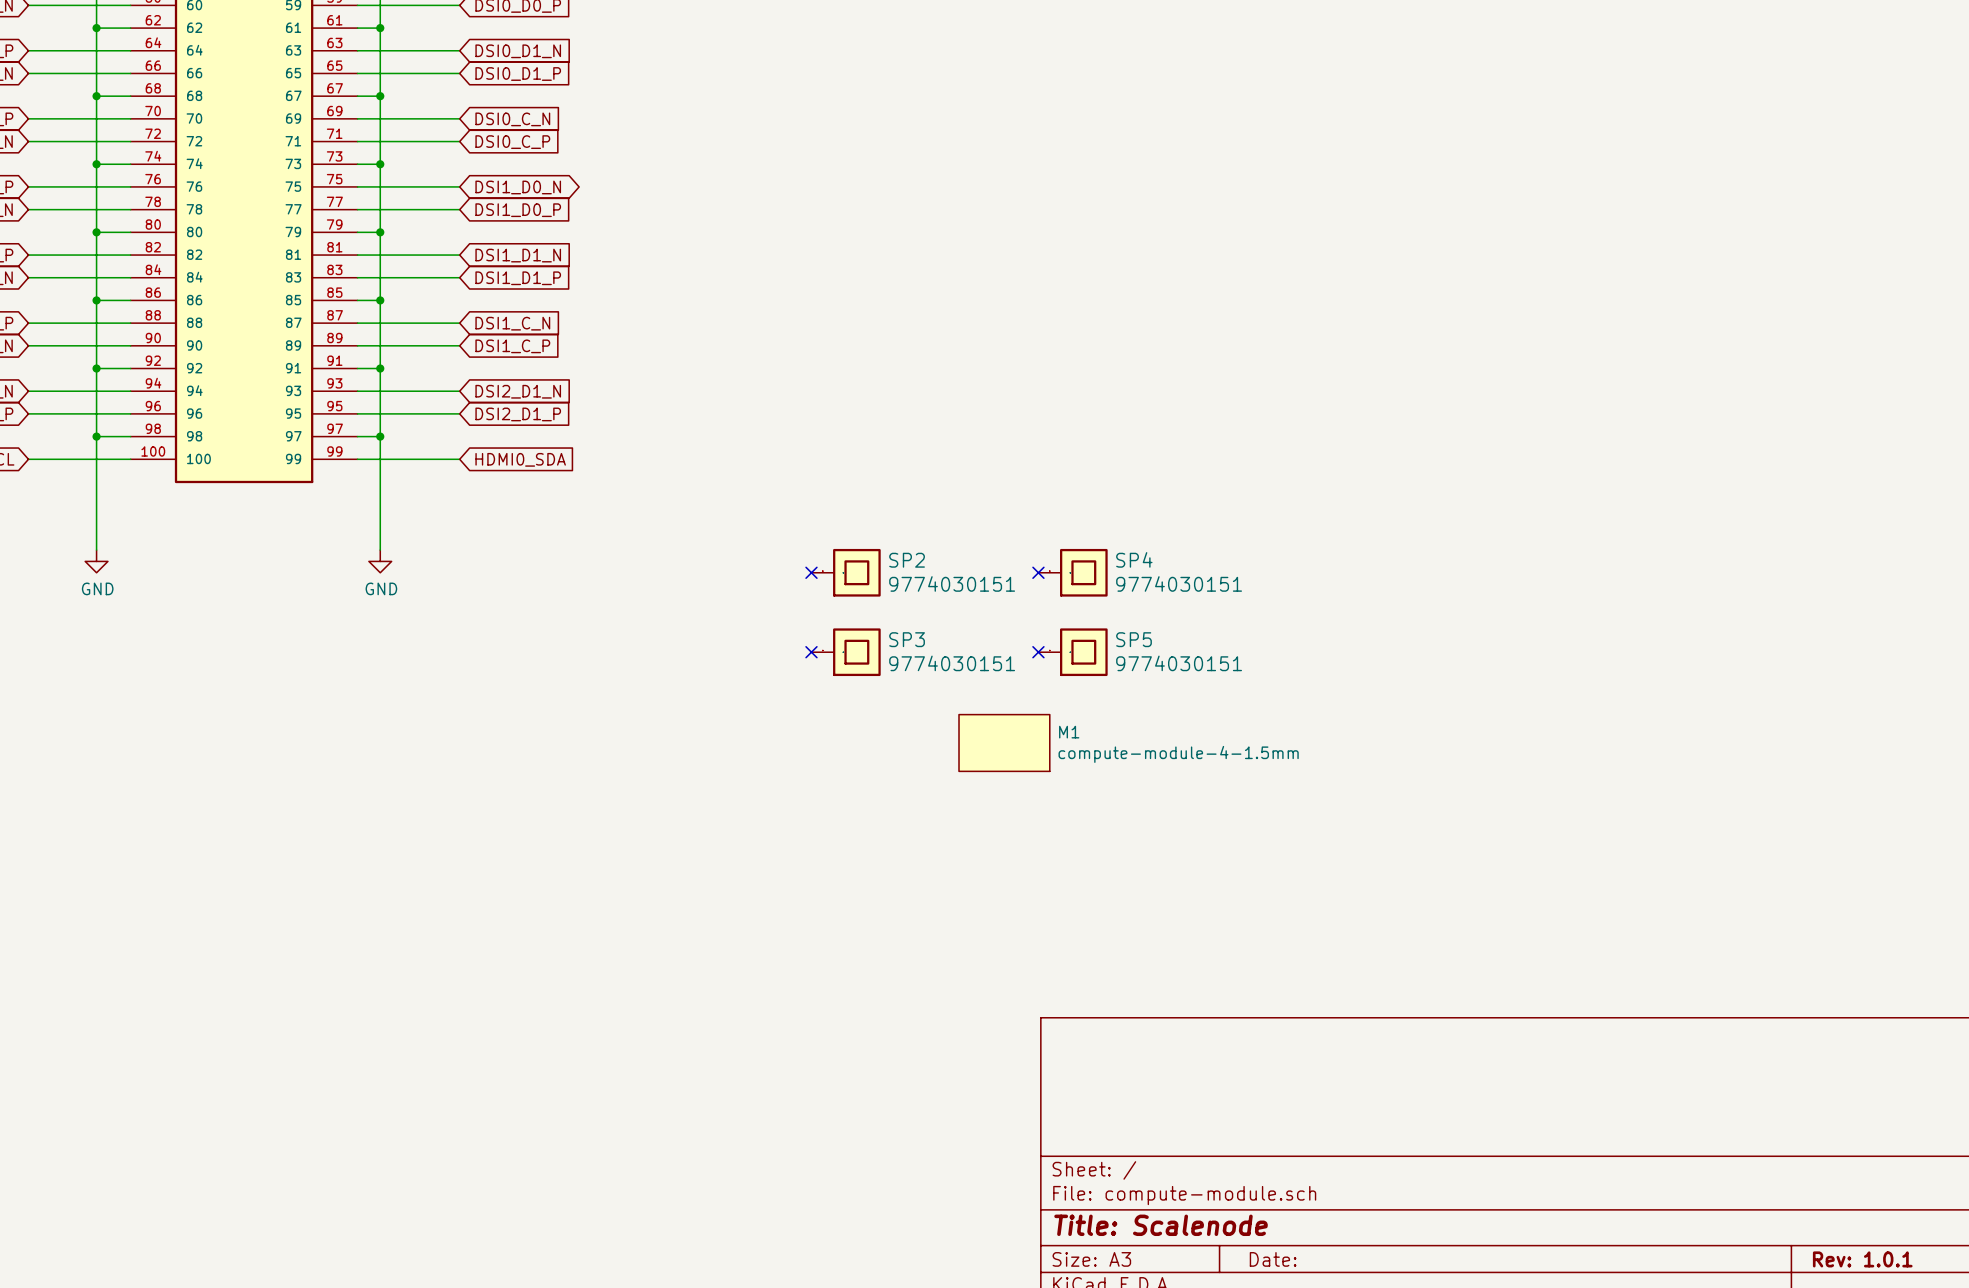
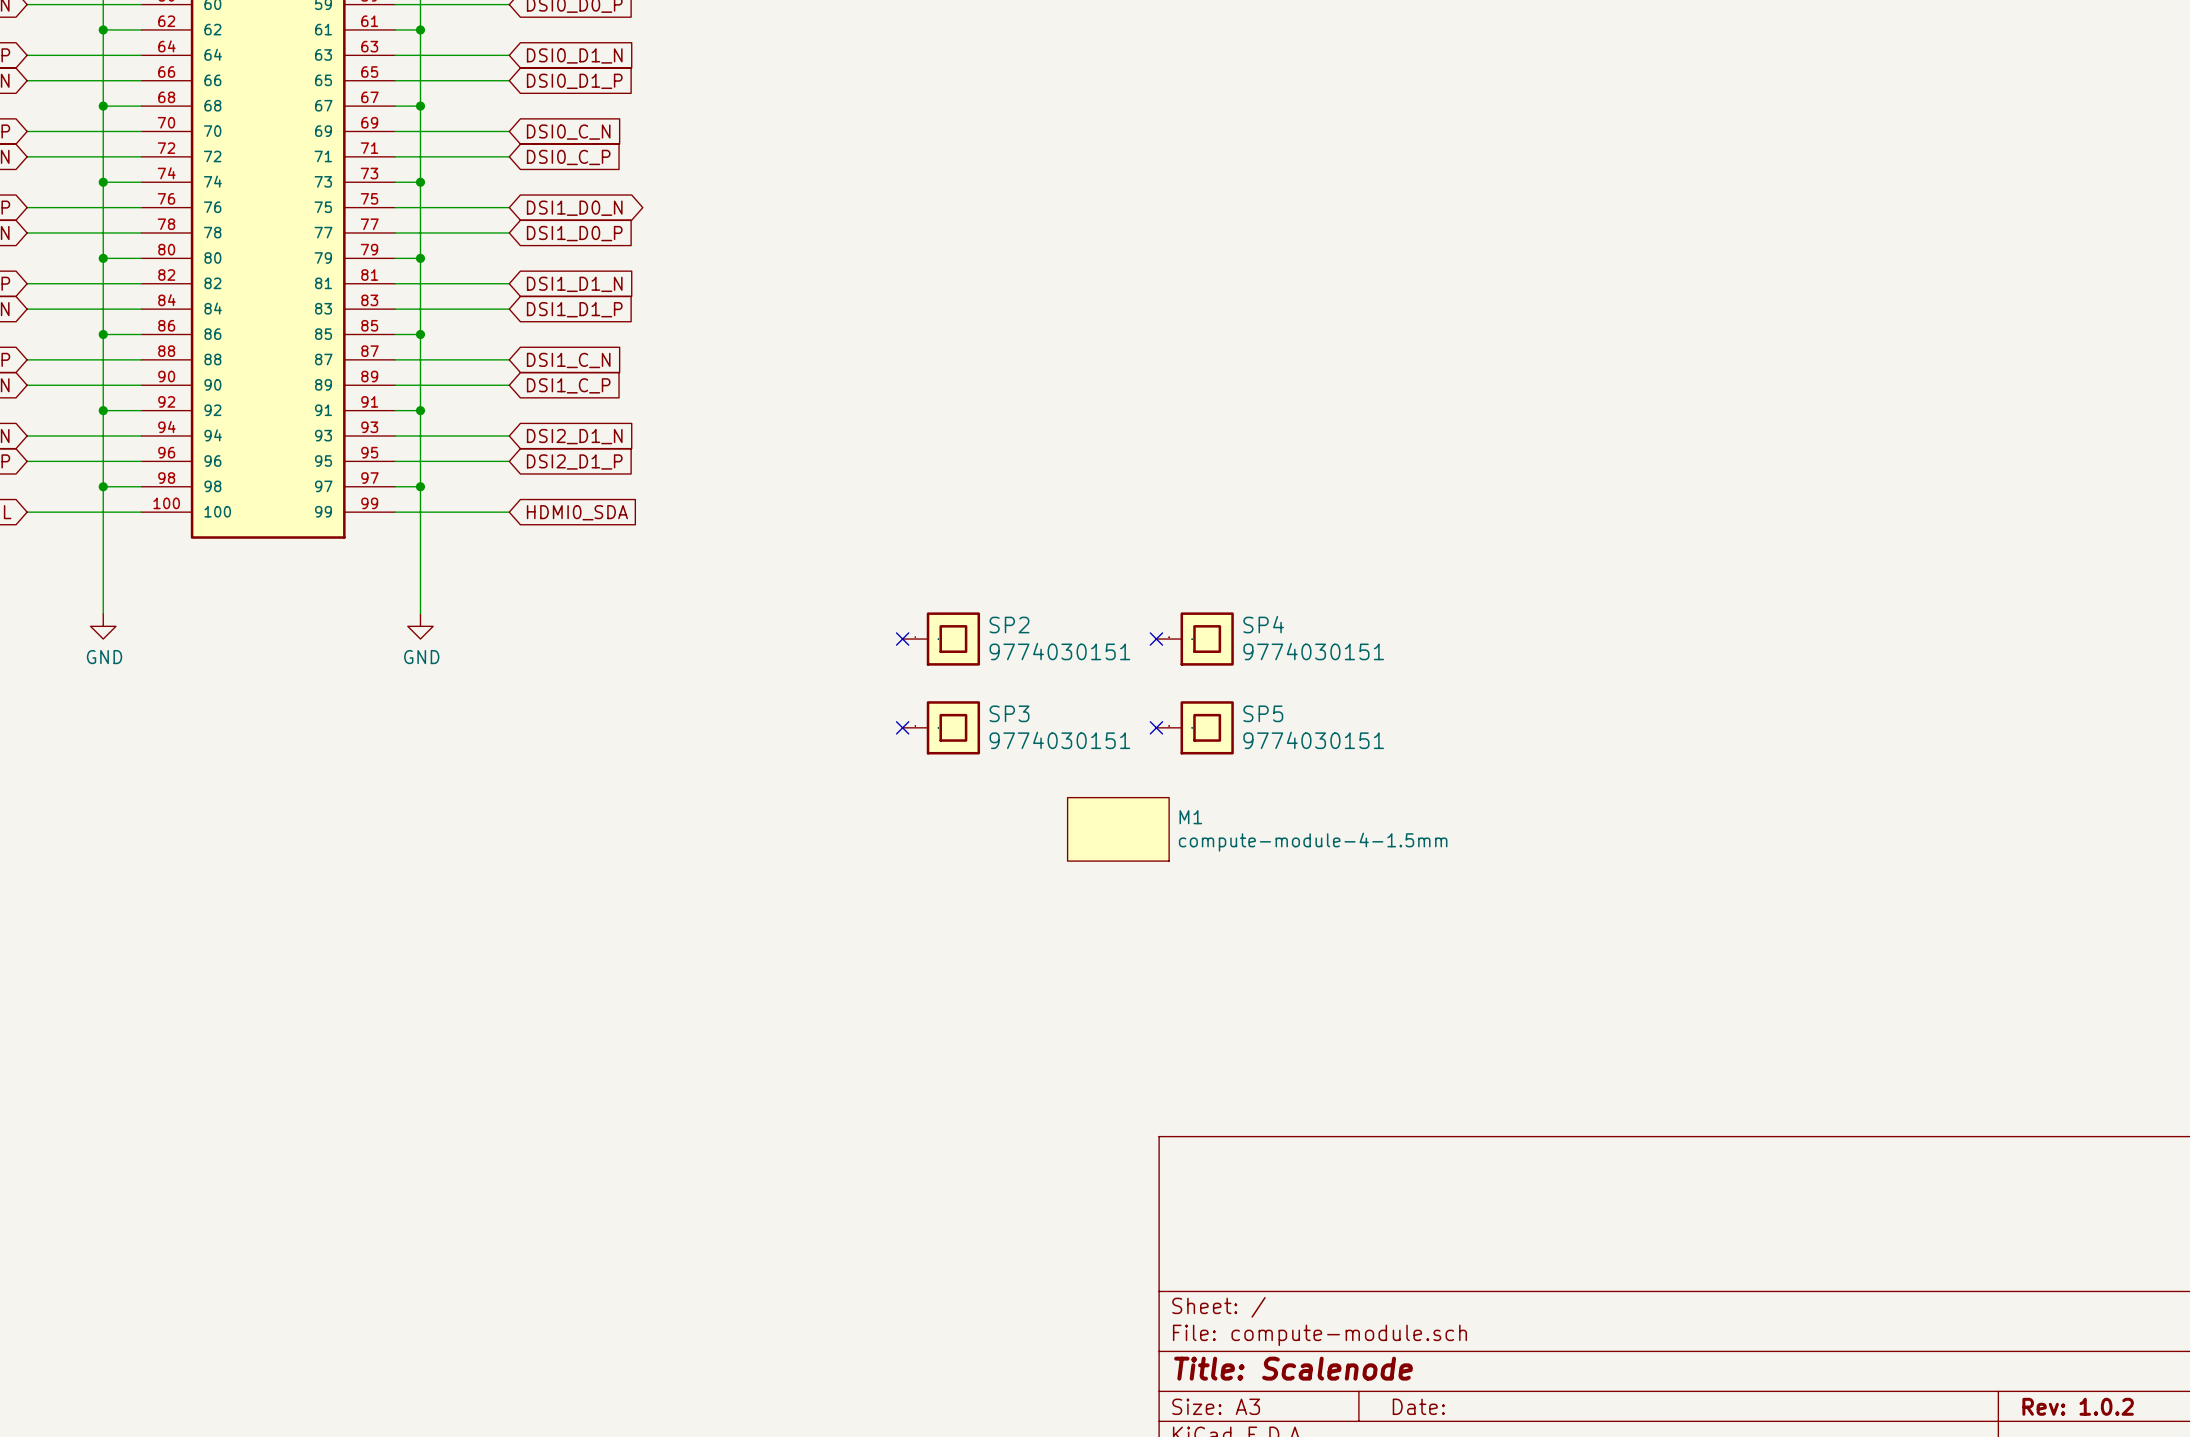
title block: Rev: 1.0.1 (1862, 1259) -> Rev: 1.0.2 (2078, 1406)

